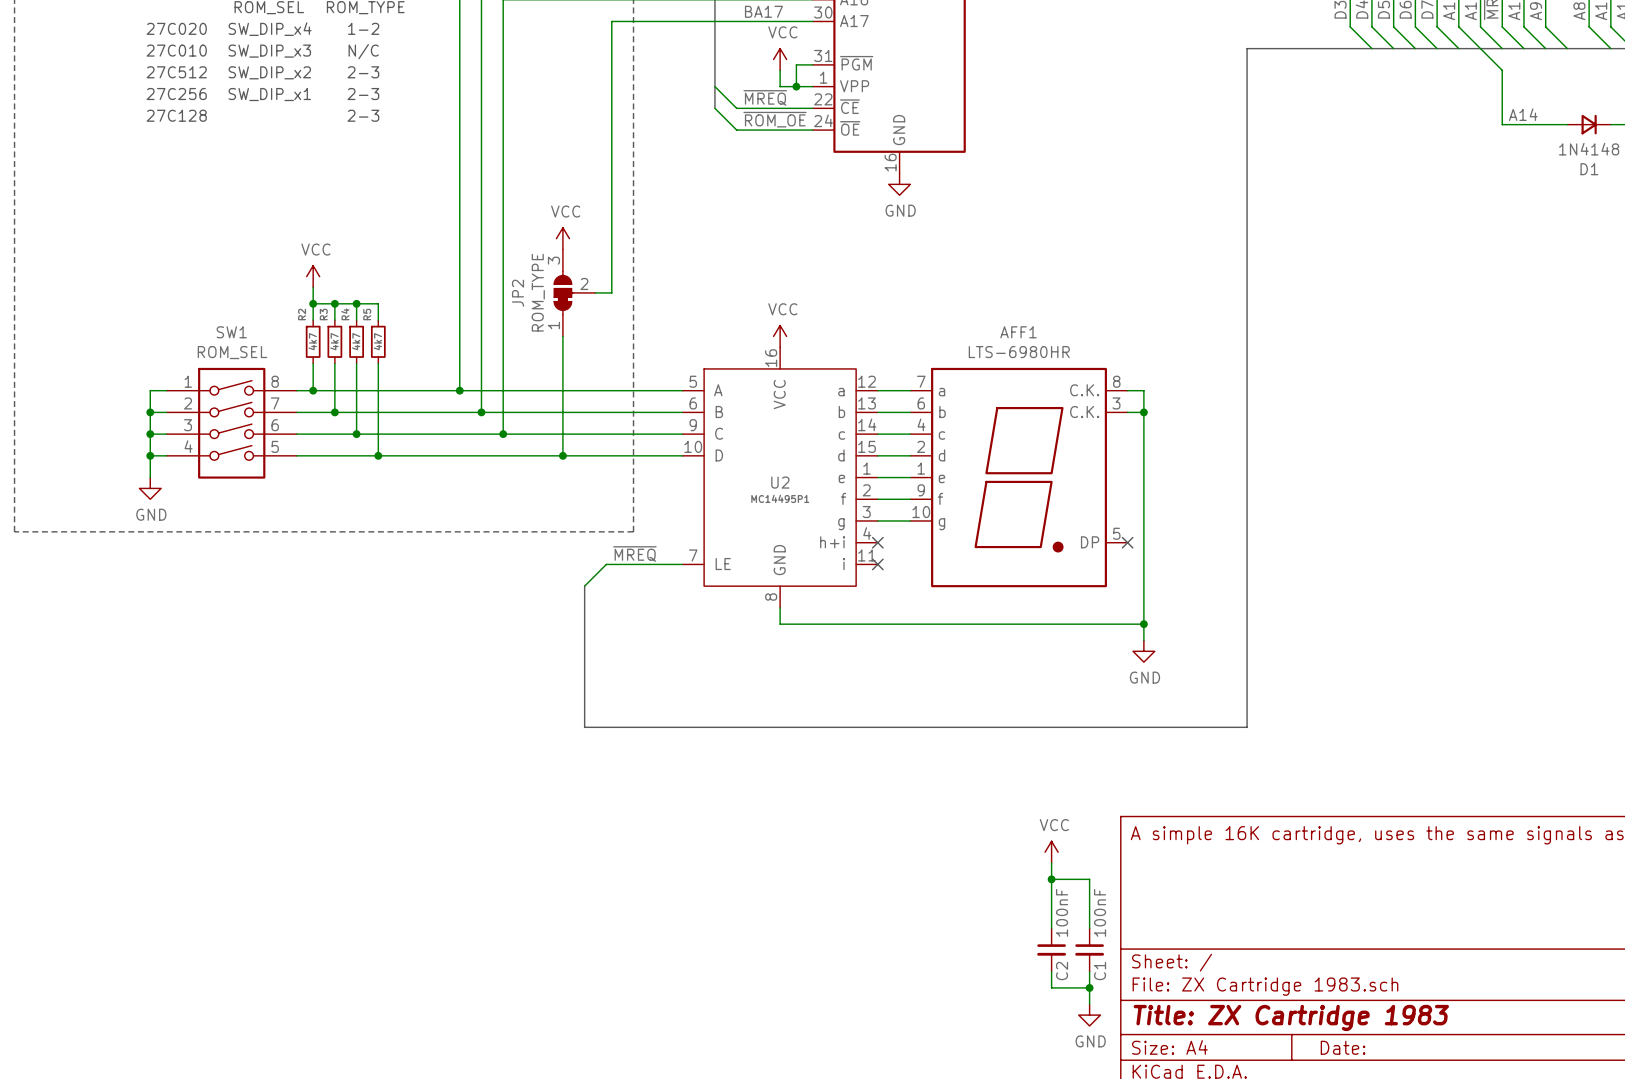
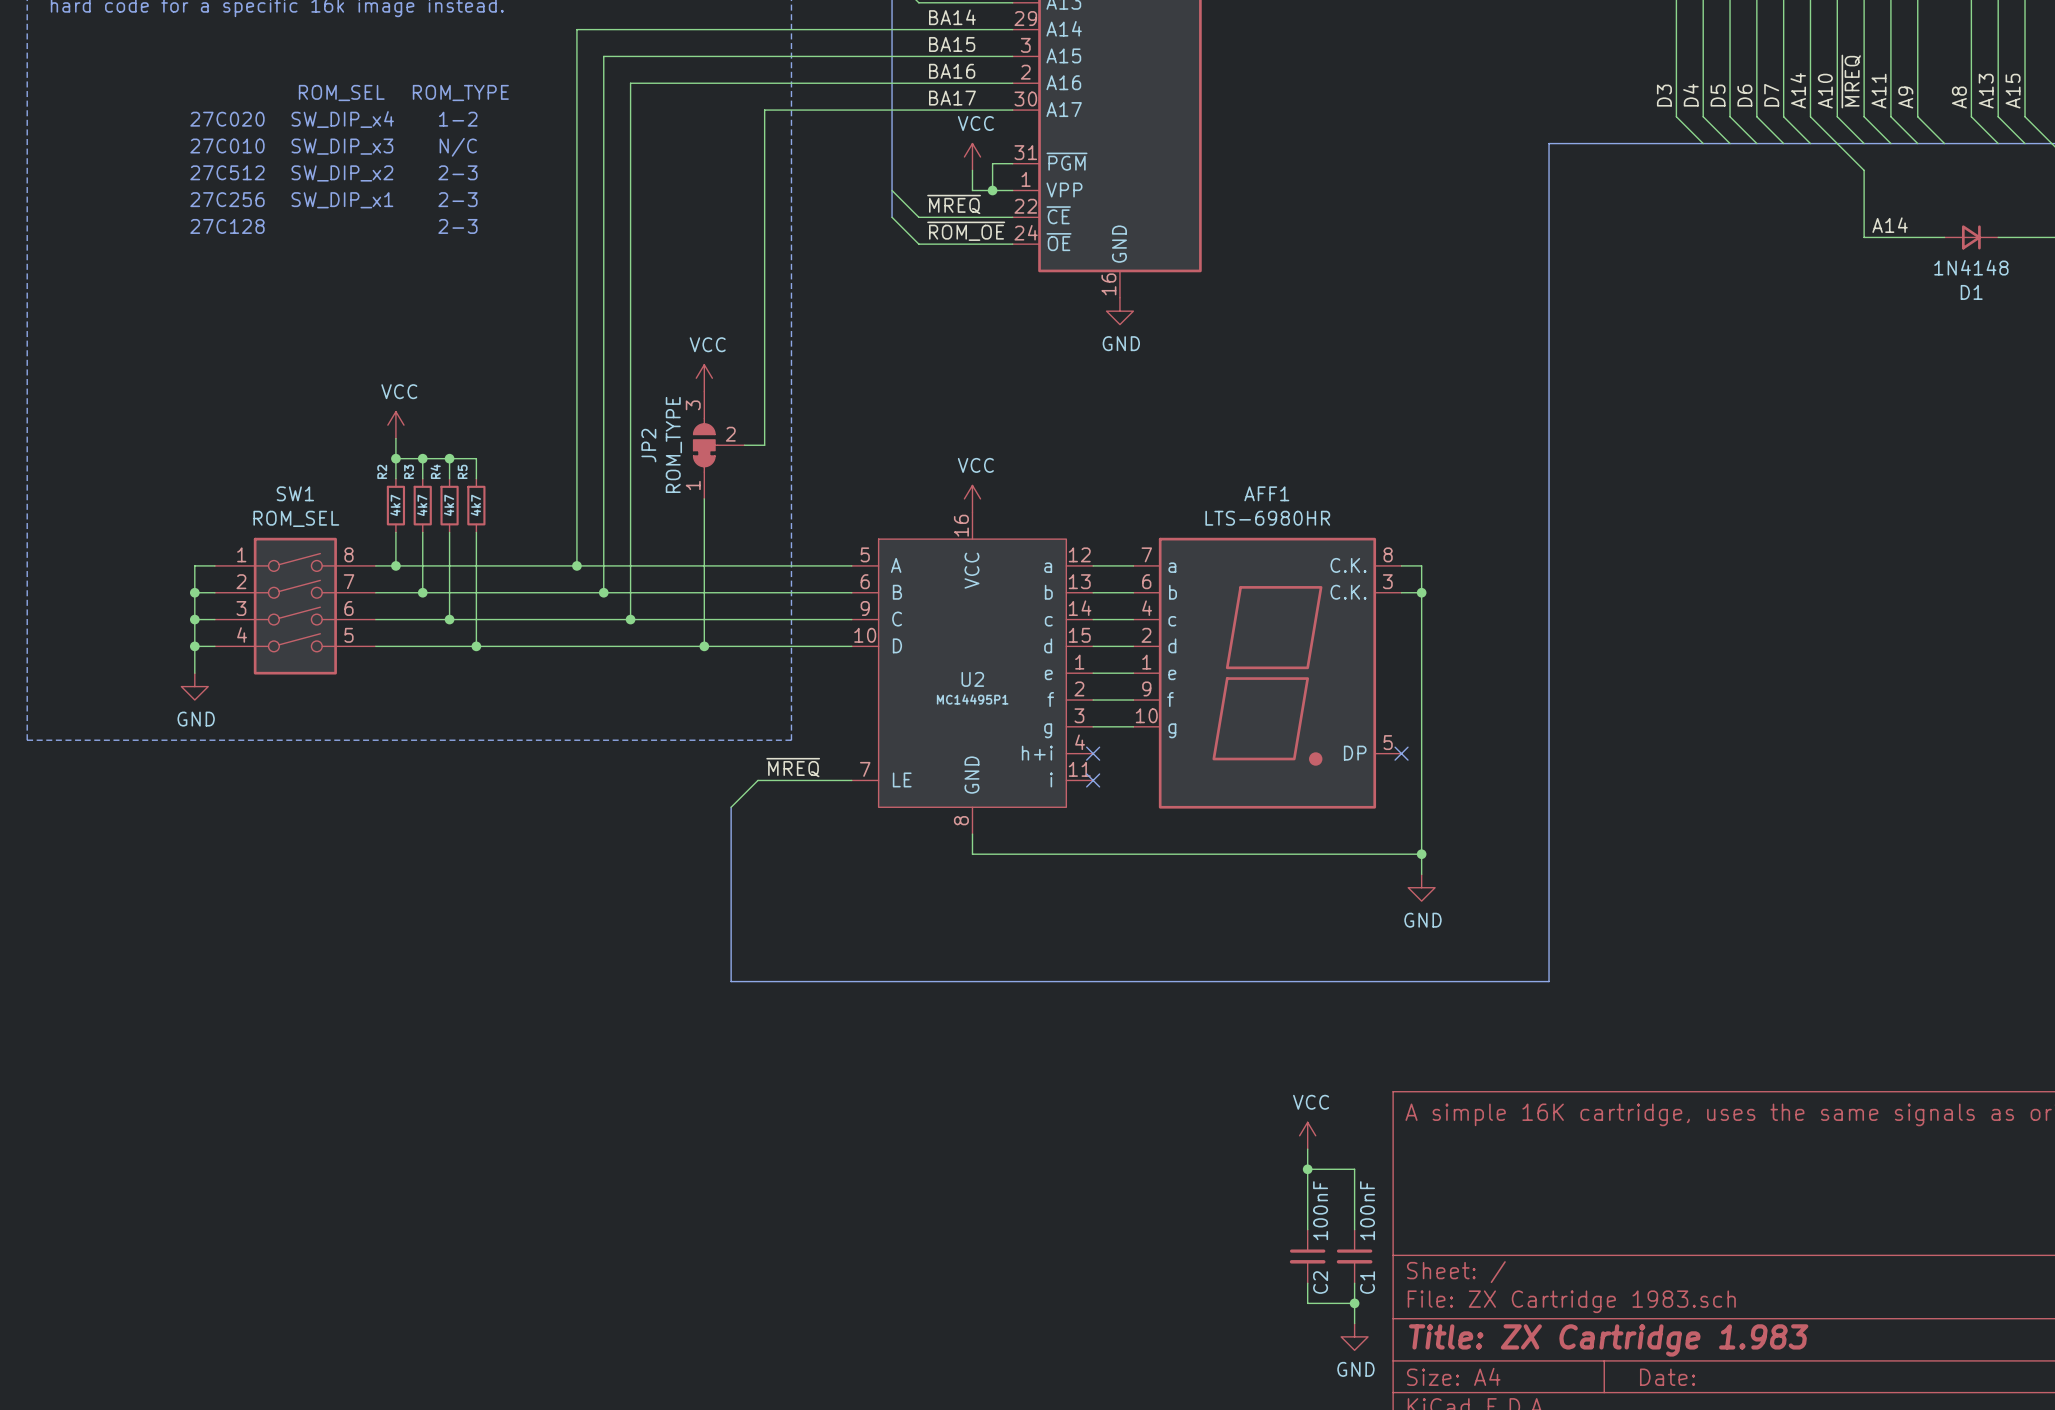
title block: Title: ZX Cartridge 1983 (1291, 1017) -> Title: ZX Cartridge 1.983 (1608, 1340)

